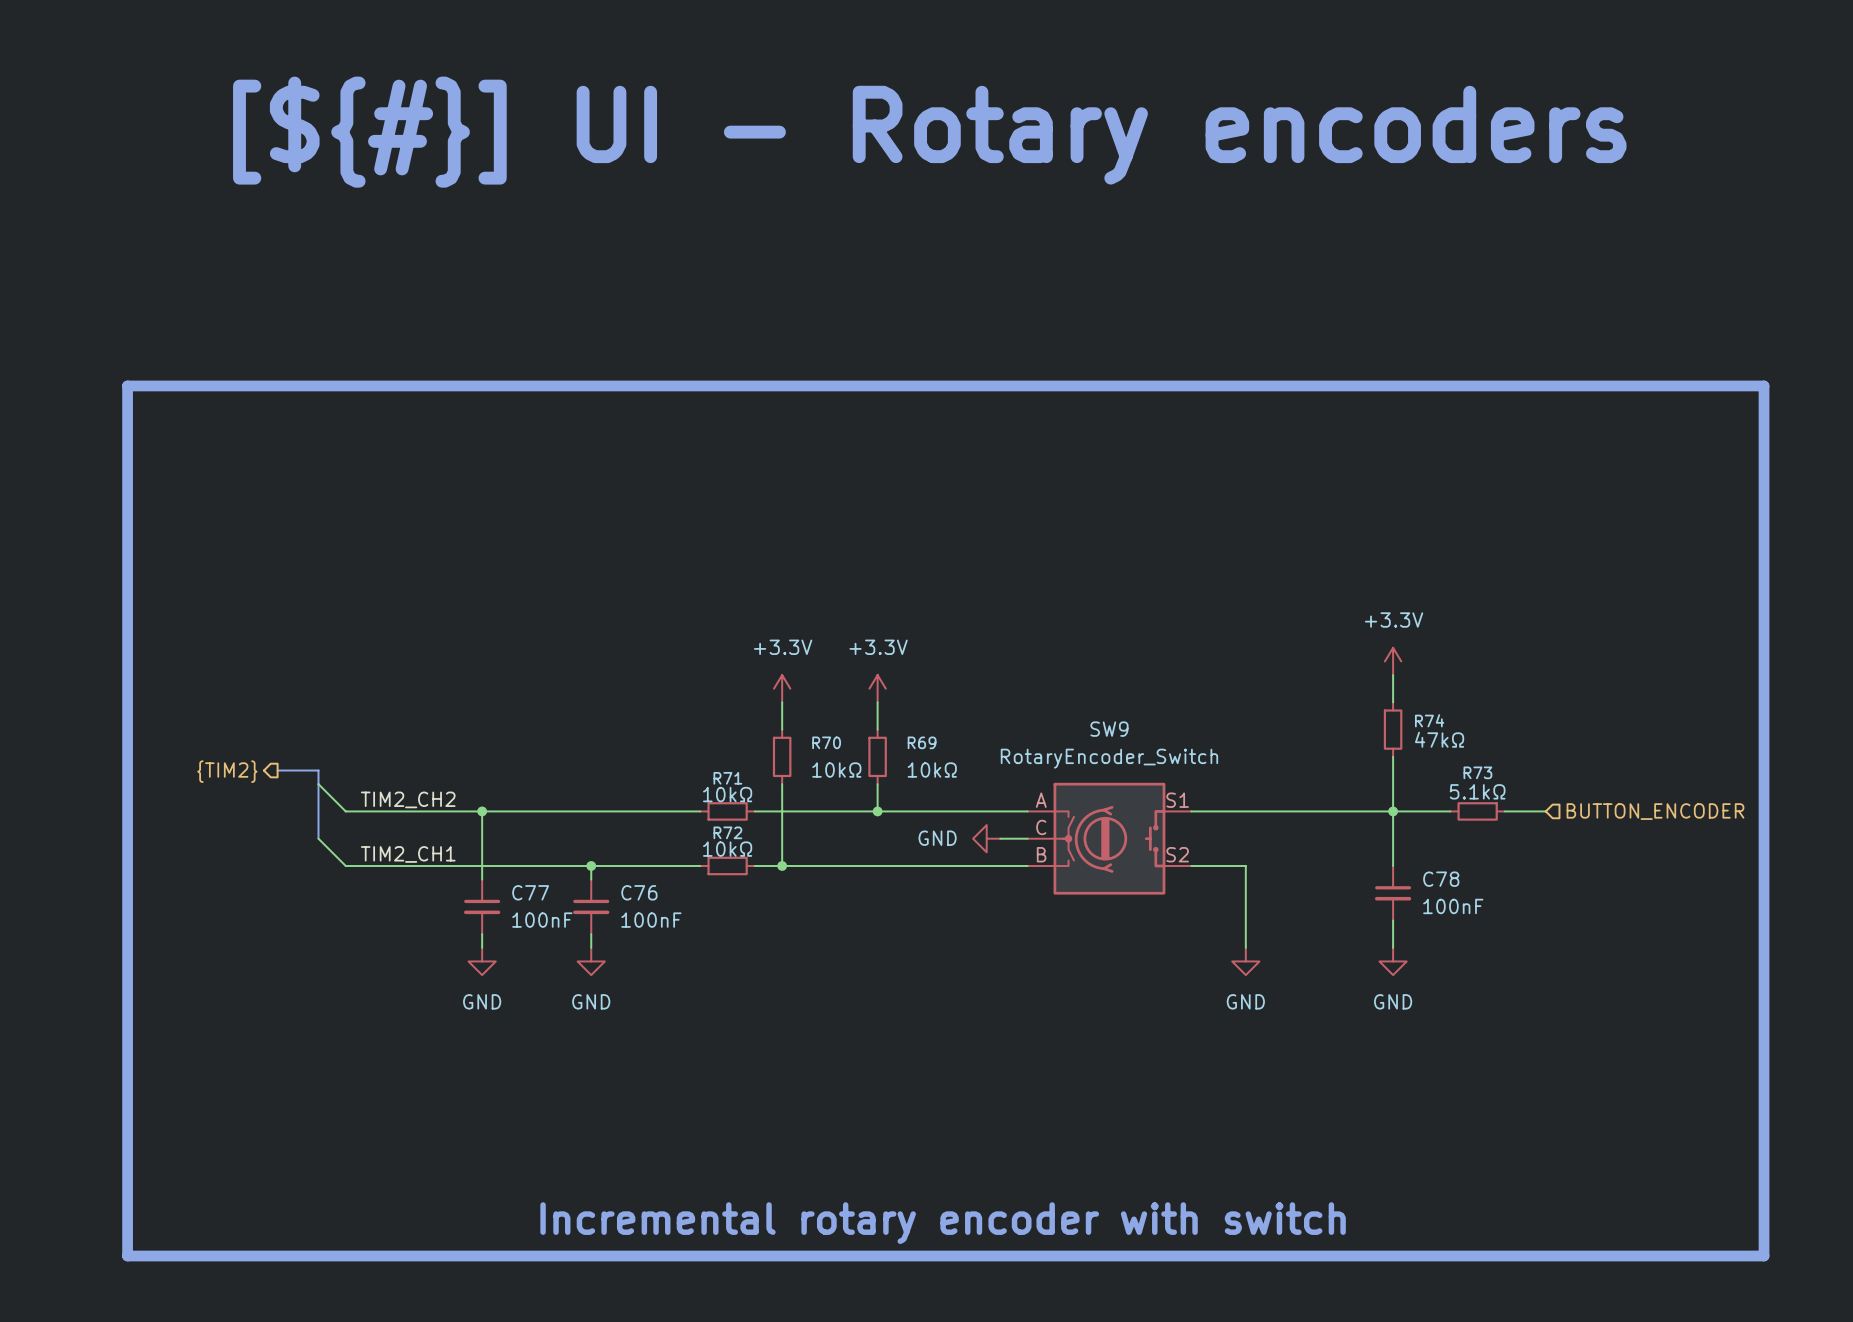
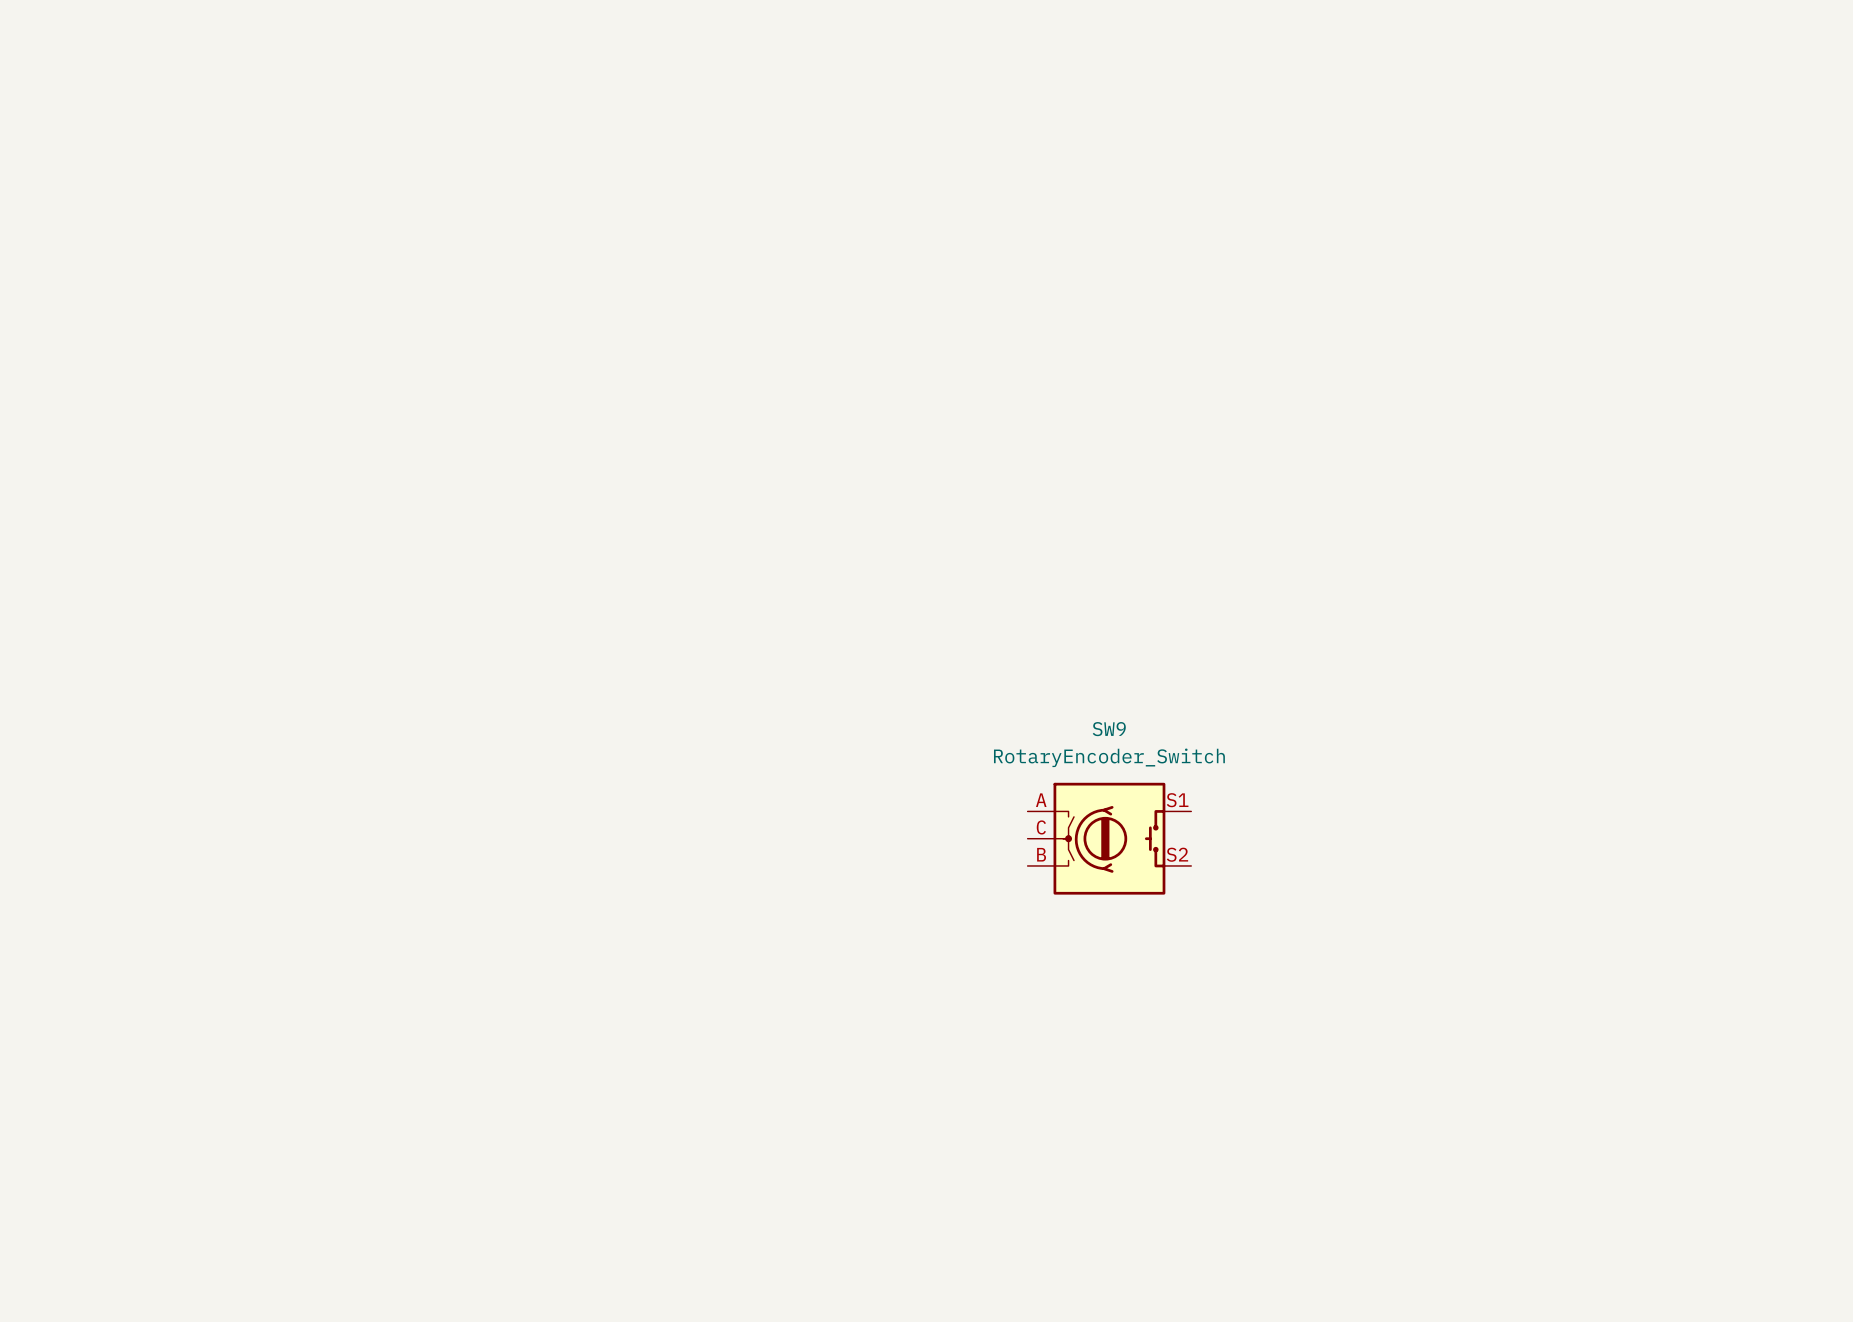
text: [${#}] UI - Rotary encoders (929, 132) -> none
line: (127, 385) (1764, 385) (1764, 1256) (127, 1256) (127, 385) -> none
power symbol: +3.3V (1393, 661) -> none
wire: (1393, 675) (1393, 702) -> none
power symbol: +3.3V (782, 688) -> none
power symbol: +3.3V (877, 688) -> none
wire: (782, 702) (782, 729) -> none
wire: (877, 702) (877, 729) -> none
R74: 47kΩ (1393, 729) -> none
R70: 10kΩ (782, 756) -> none
R69: 10kΩ (877, 756) -> none
wire: (1393, 756) (1393, 865) -> none
bus: (277, 770) (318, 770) (318, 838) -> none
hierarchical label: {TIM2} (227, 771) -> none
wire: (318, 784) (345, 811) (700, 811) -> none
wire: (782, 784) (782, 865) -> none
wire: (877, 784) (877, 811) -> none
label: TIM2_CH2 (408, 799) -> none
wire: (482, 811) (482, 879) -> none
junction: (482, 811) -> none
R71: 10kΩ (727, 811) -> none
wire: (754, 811) (1027, 811) -> none
junction: (877, 811) -> none
wire: (1191, 811) (1450, 811) -> none
junction: (1393, 811) -> none
R73: 5.1kΩ (1477, 811) -> none
wire: (1504, 811) (1545, 811) -> none
hierarchical label: BUTTON_ENCODER (1655, 811) -> none
wire: (318, 838) (345, 865) (700, 865) -> none
power symbol: GND (986, 838) -> none
wire: (1000, 838) (1027, 838) -> none
label: TIM2_CH1 (408, 854) -> none
wire: (591, 865) (591, 879) -> none
junction: (591, 865) -> none
R72: 10kΩ (727, 865) -> none
wire: (754, 865) (1027, 865) -> none
junction: (782, 865) -> none
wire: (1191, 865) (1245, 865) (1245, 947) -> none
C78: 100nF (1393, 893) -> none
C77: 100nF (482, 906) -> none
C76: 100nF (591, 906) -> none
wire: (1393, 920) (1393, 947) -> none
wire: (482, 934) (482, 947) -> none
wire: (591, 934) (591, 947) -> none
power symbol: GND (482, 961) -> none
power symbol: GND (591, 961) -> none
power symbol: GND (1245, 961) -> none
power symbol: GND (1393, 961) -> none
text: Incremental rotary encoder with switch (943, 1223) -> none

